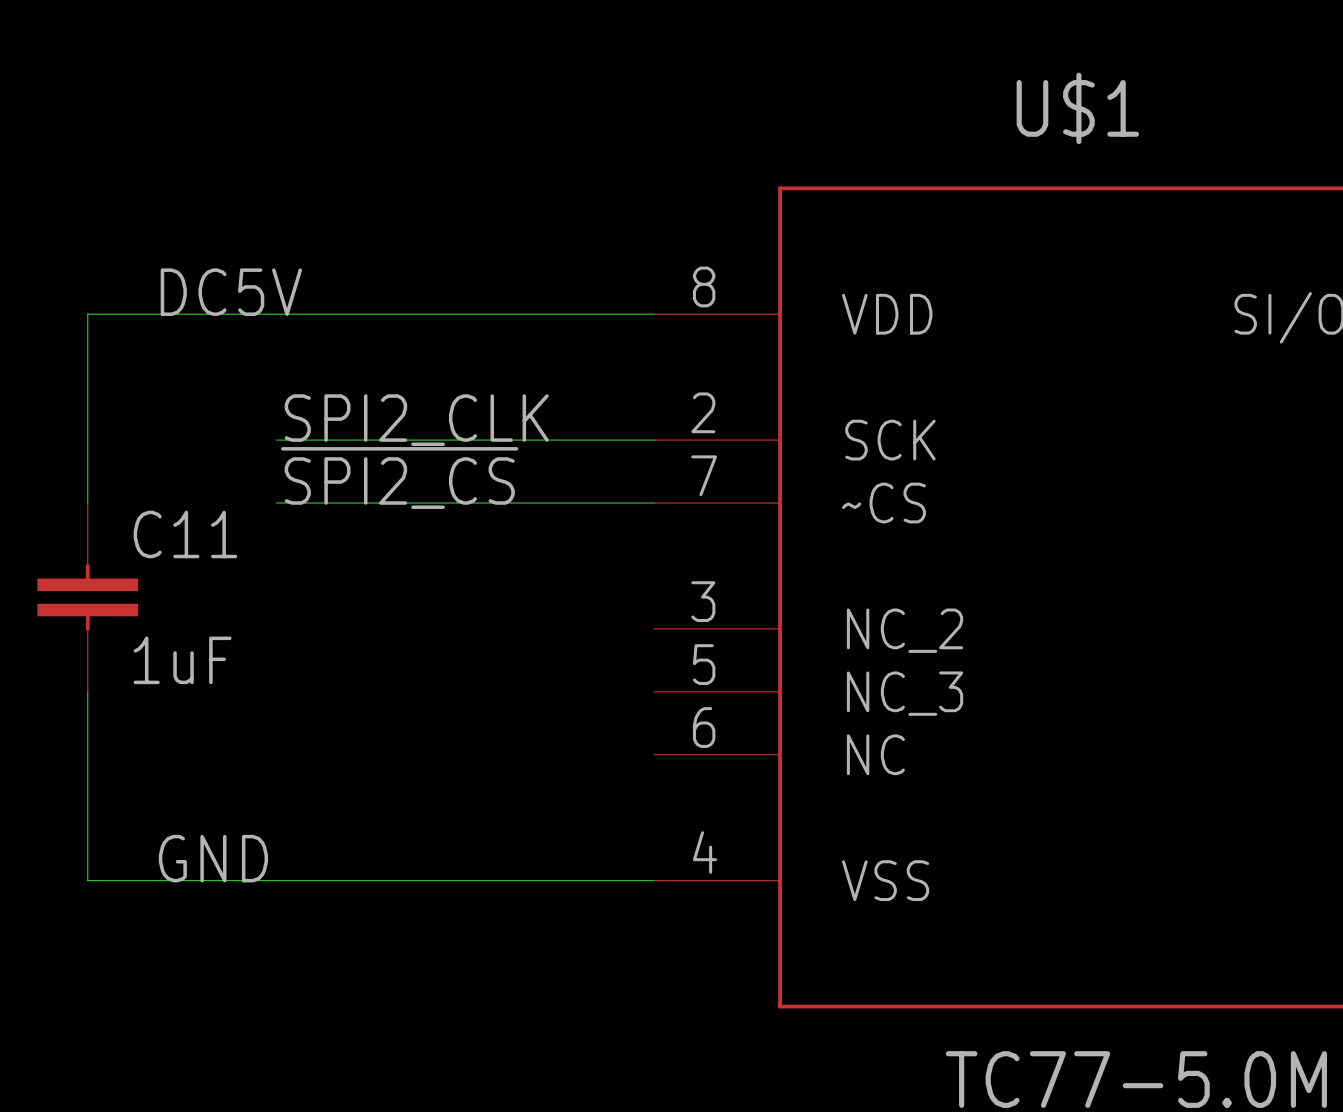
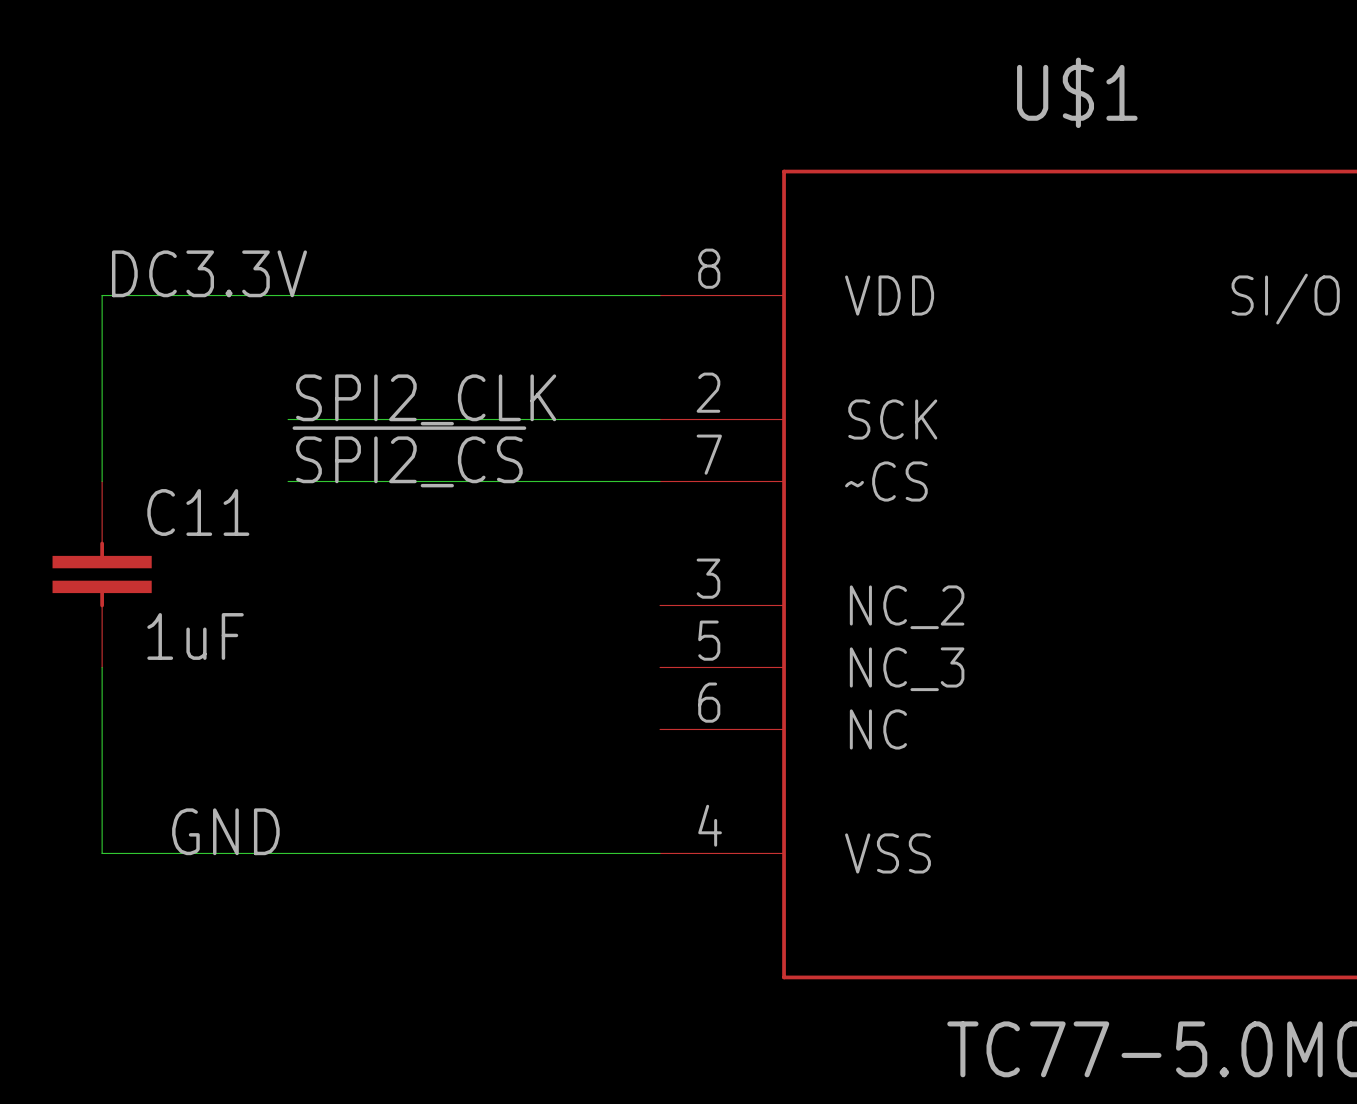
label: none -> DC3.3V (209, 273)
label: DC5V (231, 292) -> none

